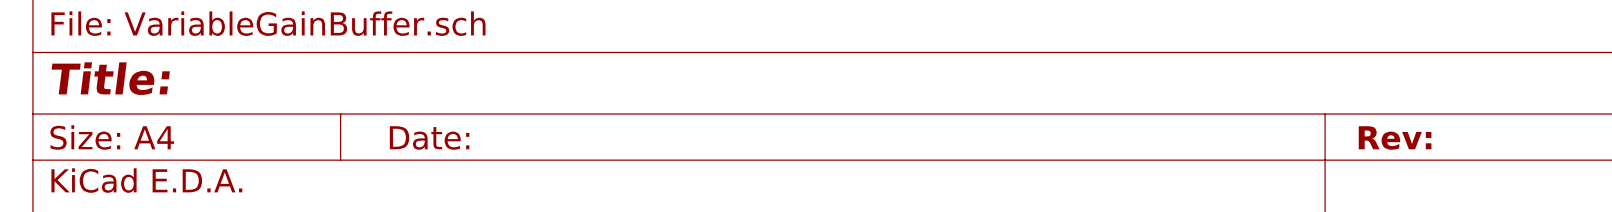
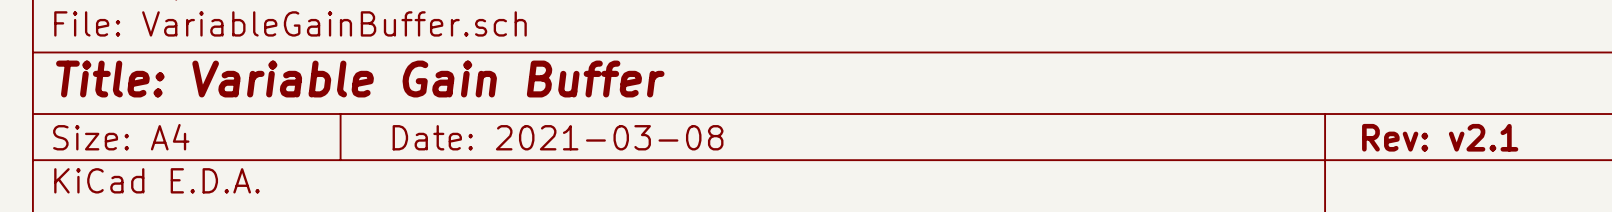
title block: Title: (110, 78) -> Title: Variable Gain Buffer (360, 79)
title block: Date: (429, 137) -> Date: 2021-03-08 (558, 137)
title block: Rev: (1395, 137) -> Rev: v2.1 (1440, 137)

